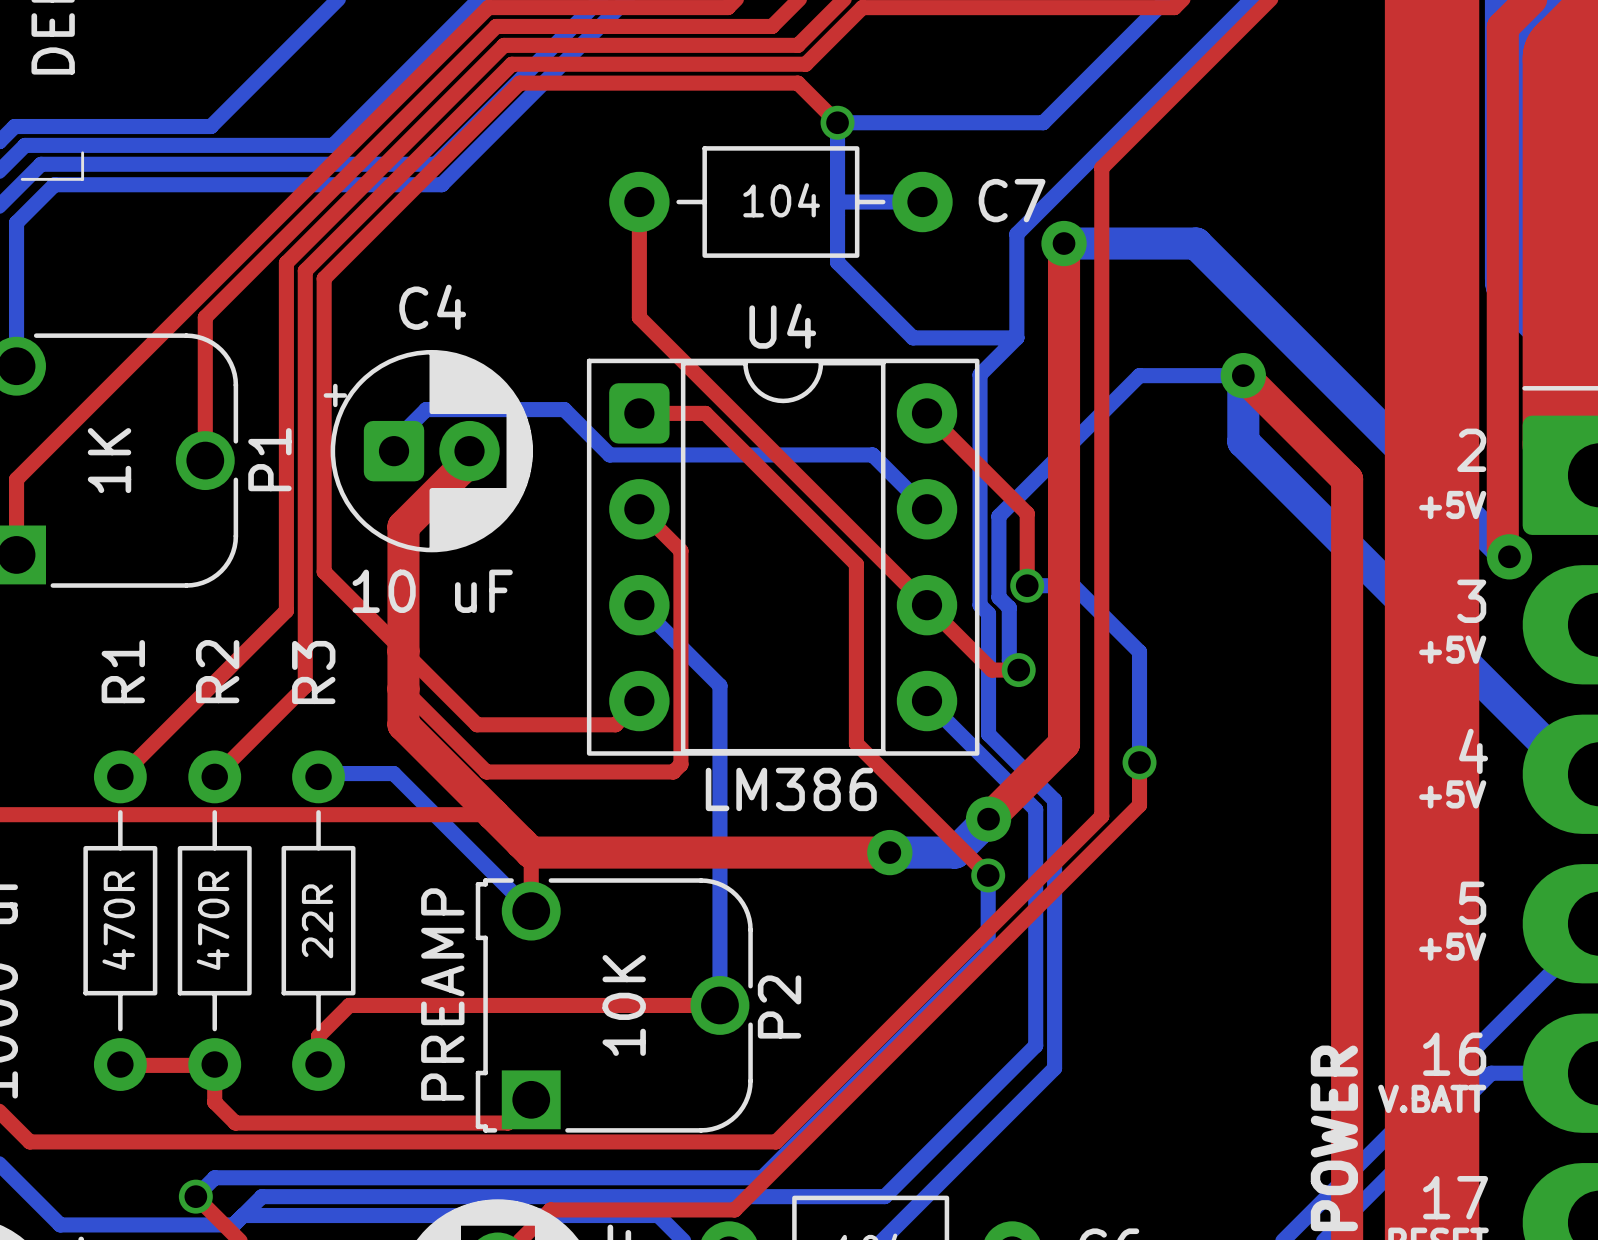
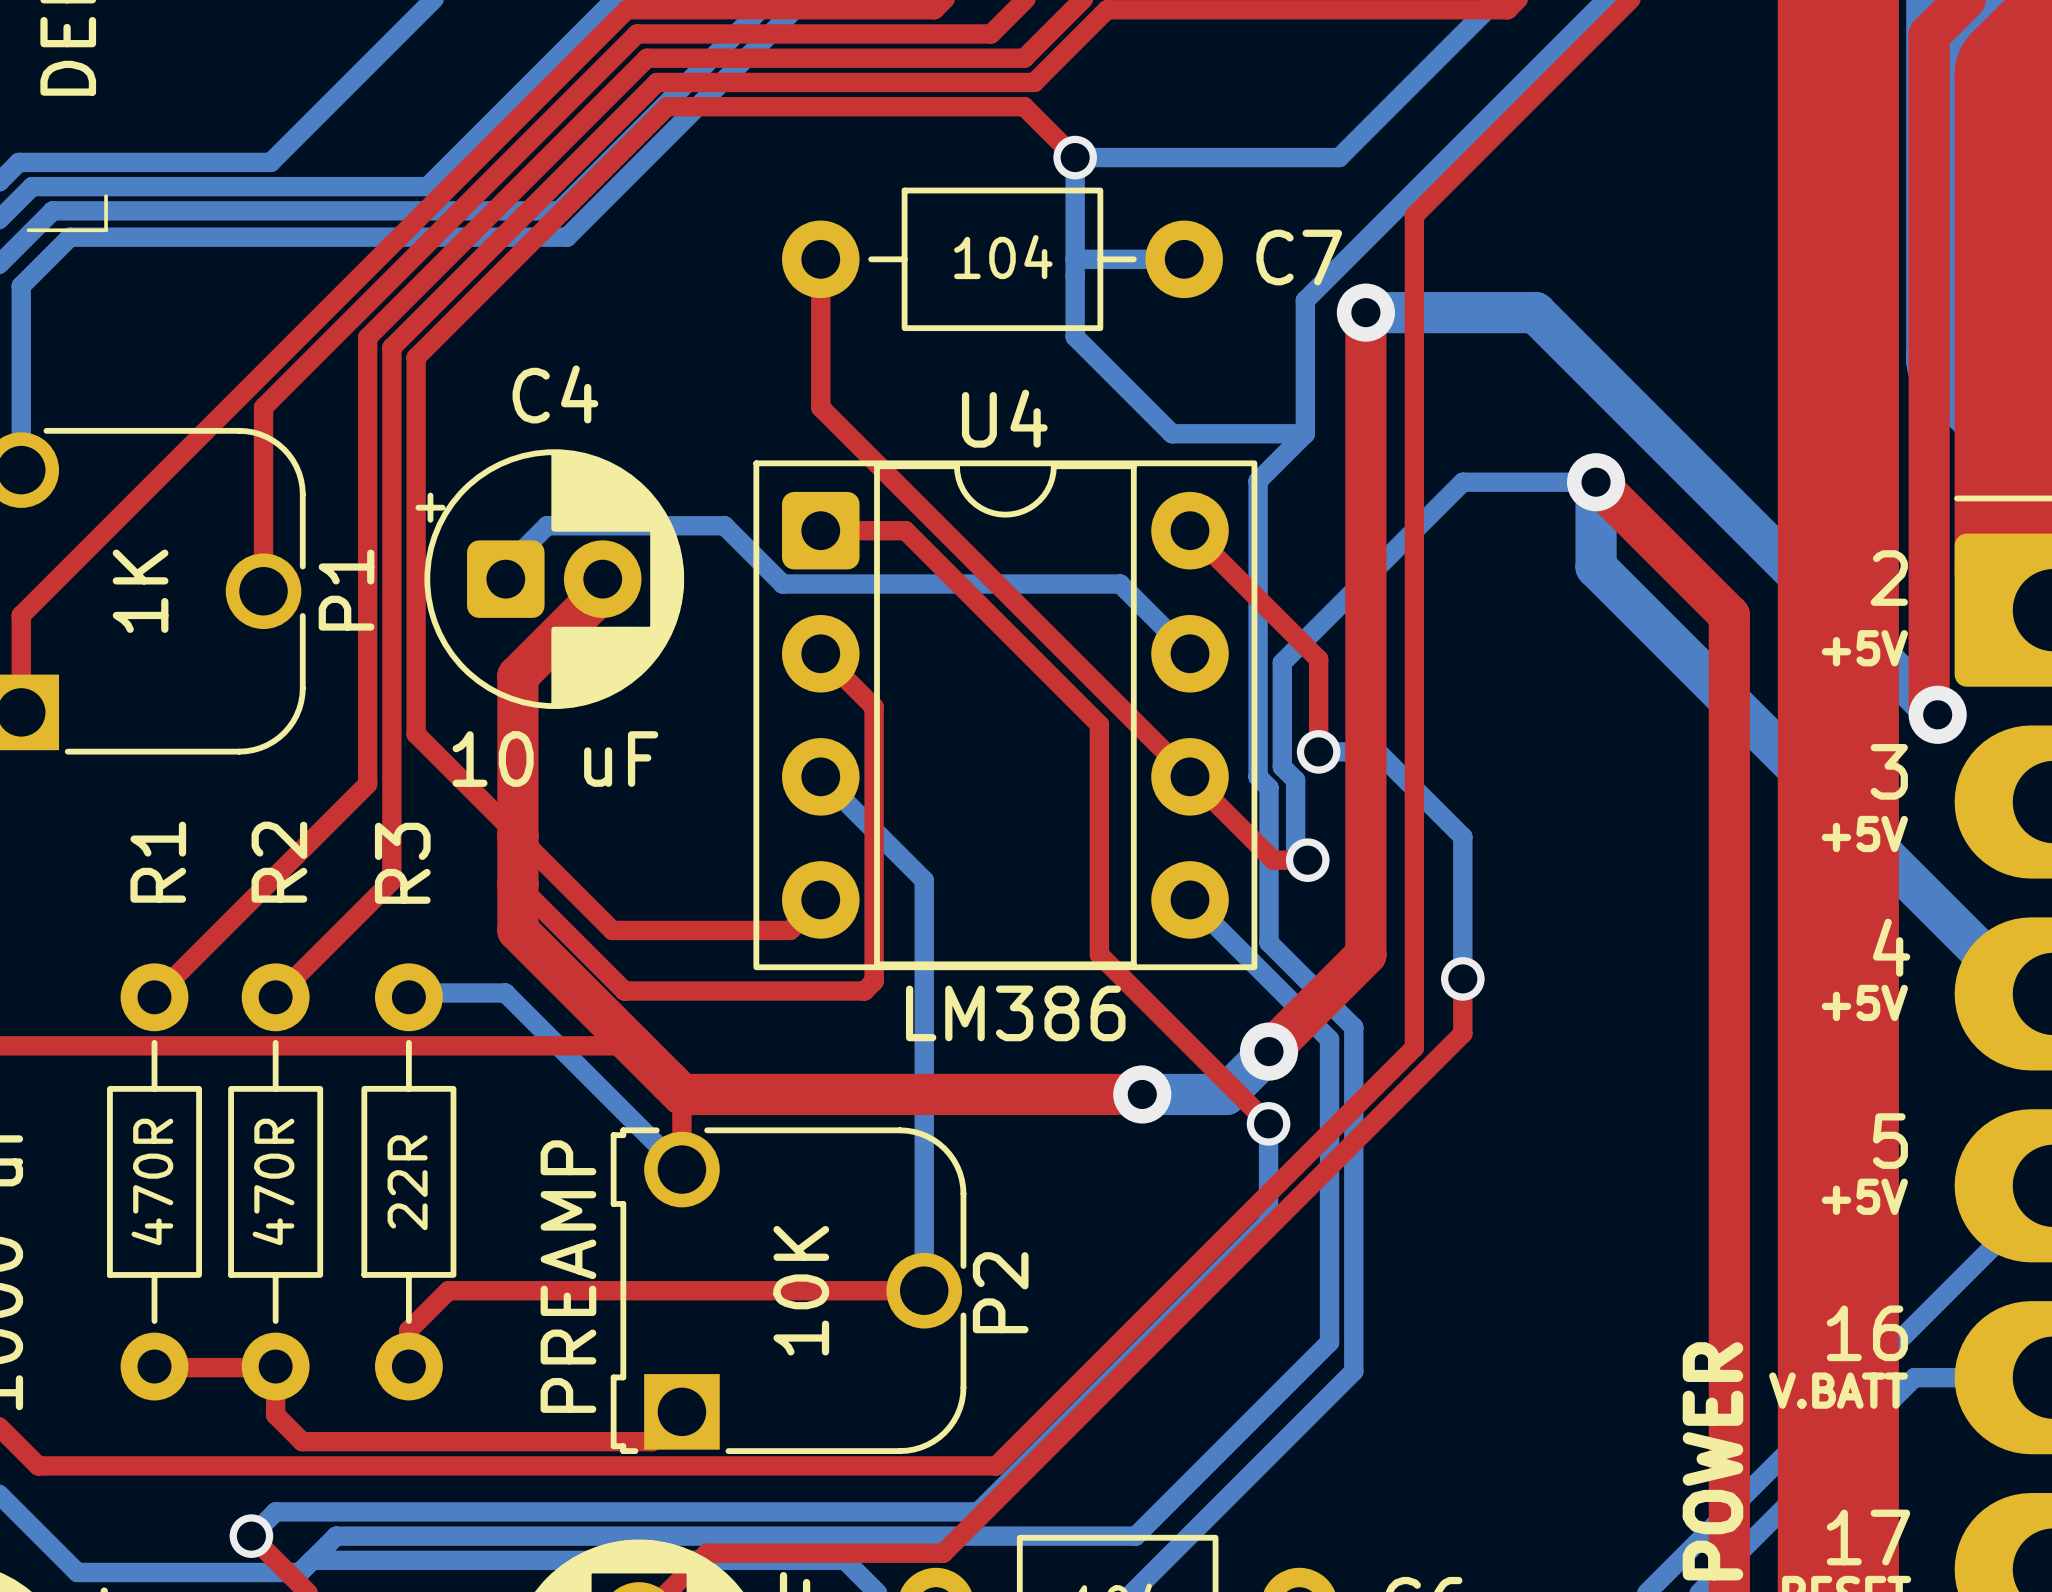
text position: 4 (1473, 751) -> 4 (1891, 947)
text position: +5V (1452, 794) -> +5V (1864, 1002)
text position: 5 (1472, 903) -> 5 (1890, 1141)
text position: +5V (1452, 946) -> +5V (1864, 1196)
text position: 16 (1454, 1054) -> 16 (1867, 1333)
text position: V.BATT (1432, 1098) -> V.BATT (1838, 1390)

